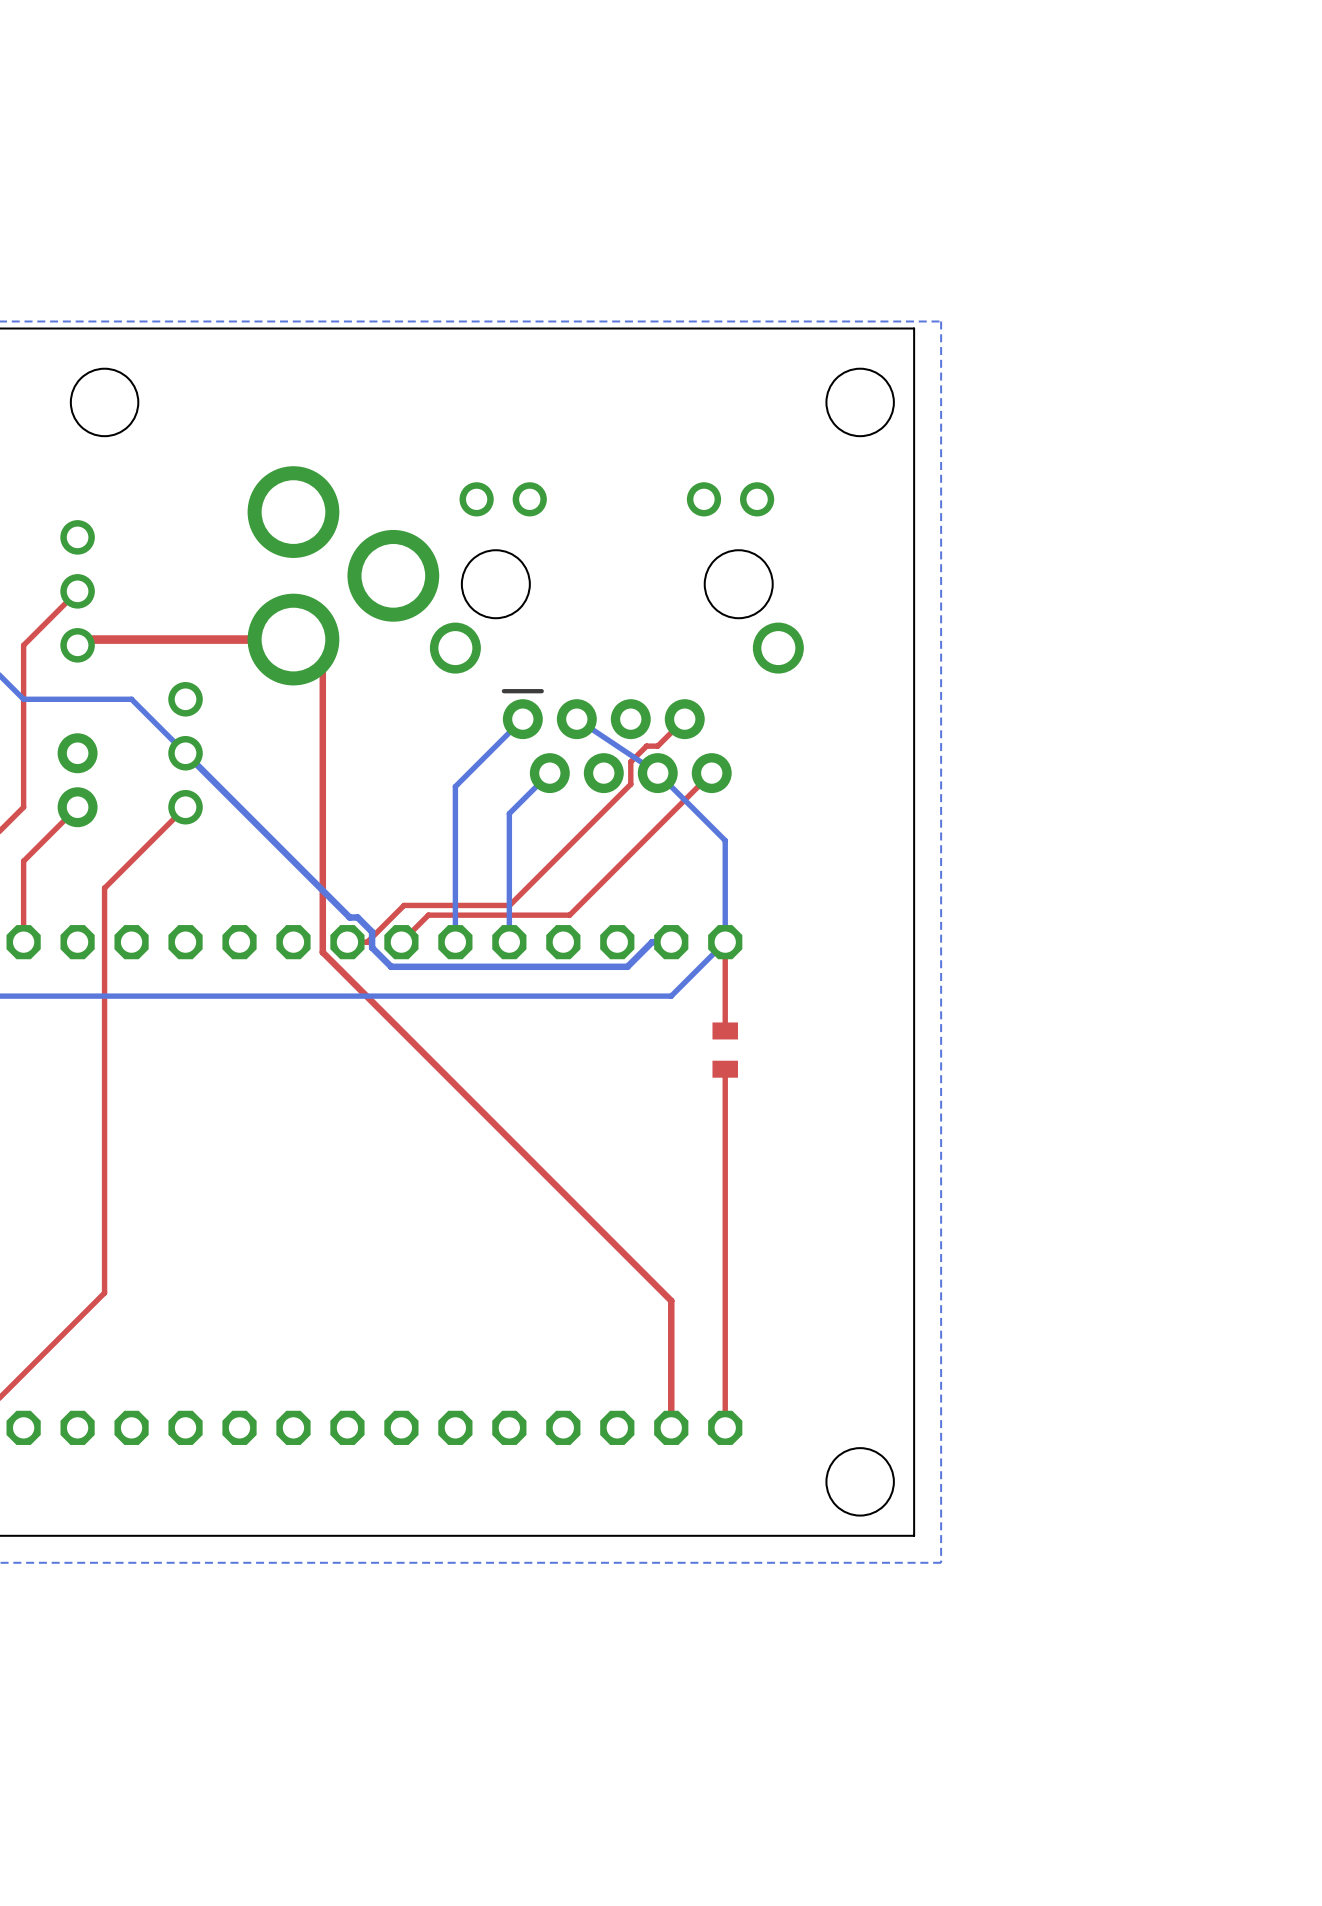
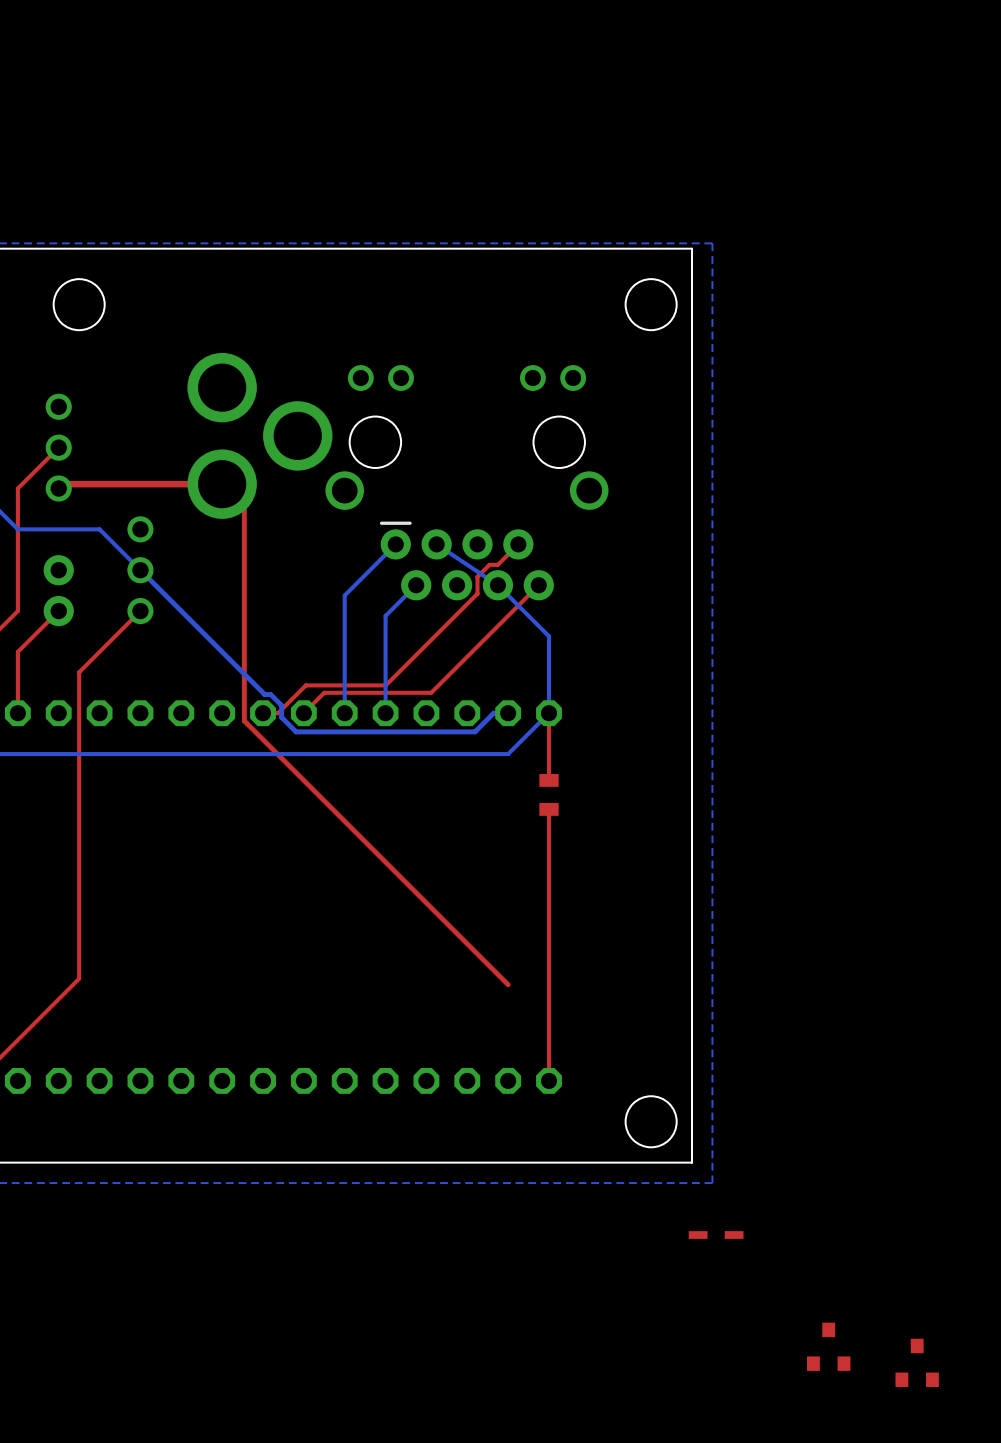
top track: (671, 1300) (671, 1427) -> none
part: none -> (716, 1235)
part: none -> (828, 1346)
part: none -> (917, 1362)

